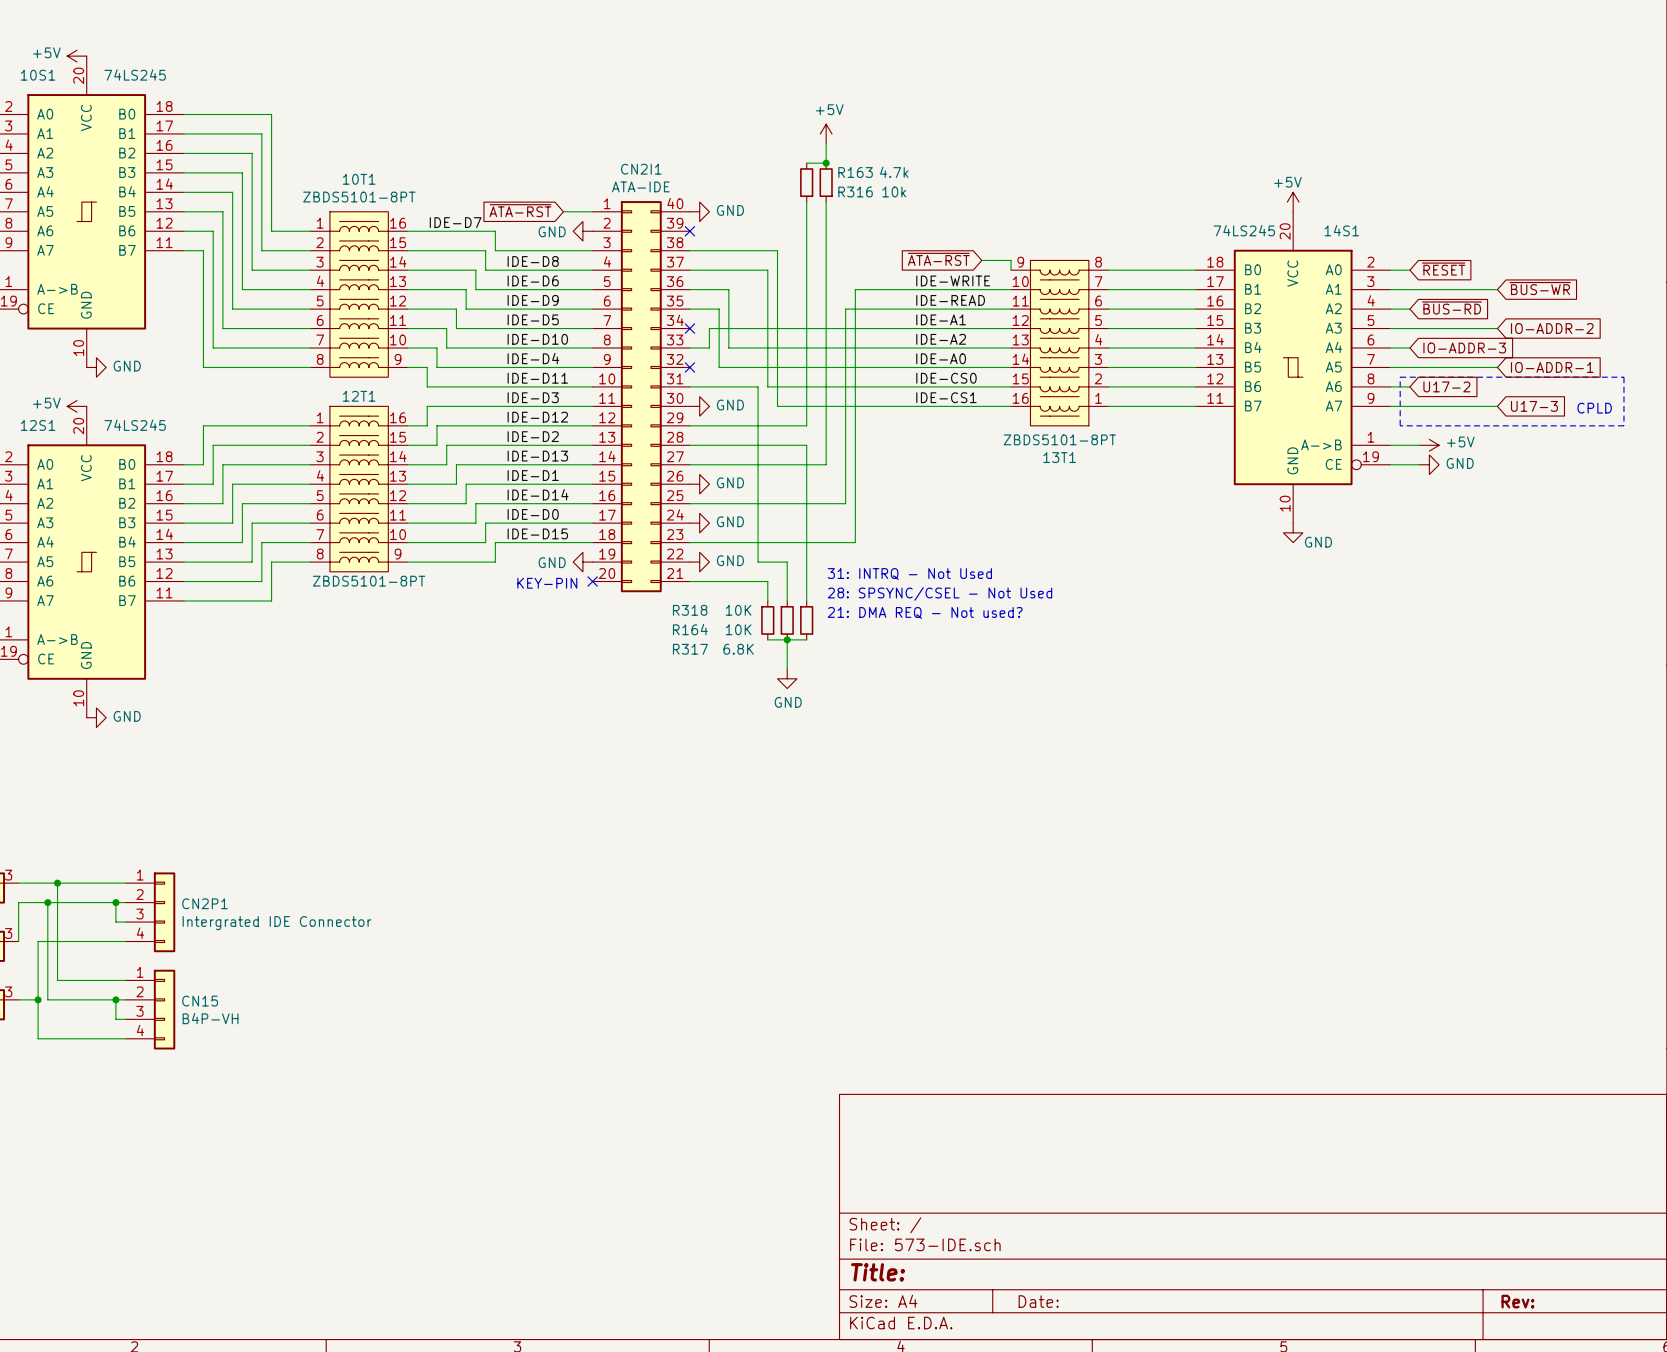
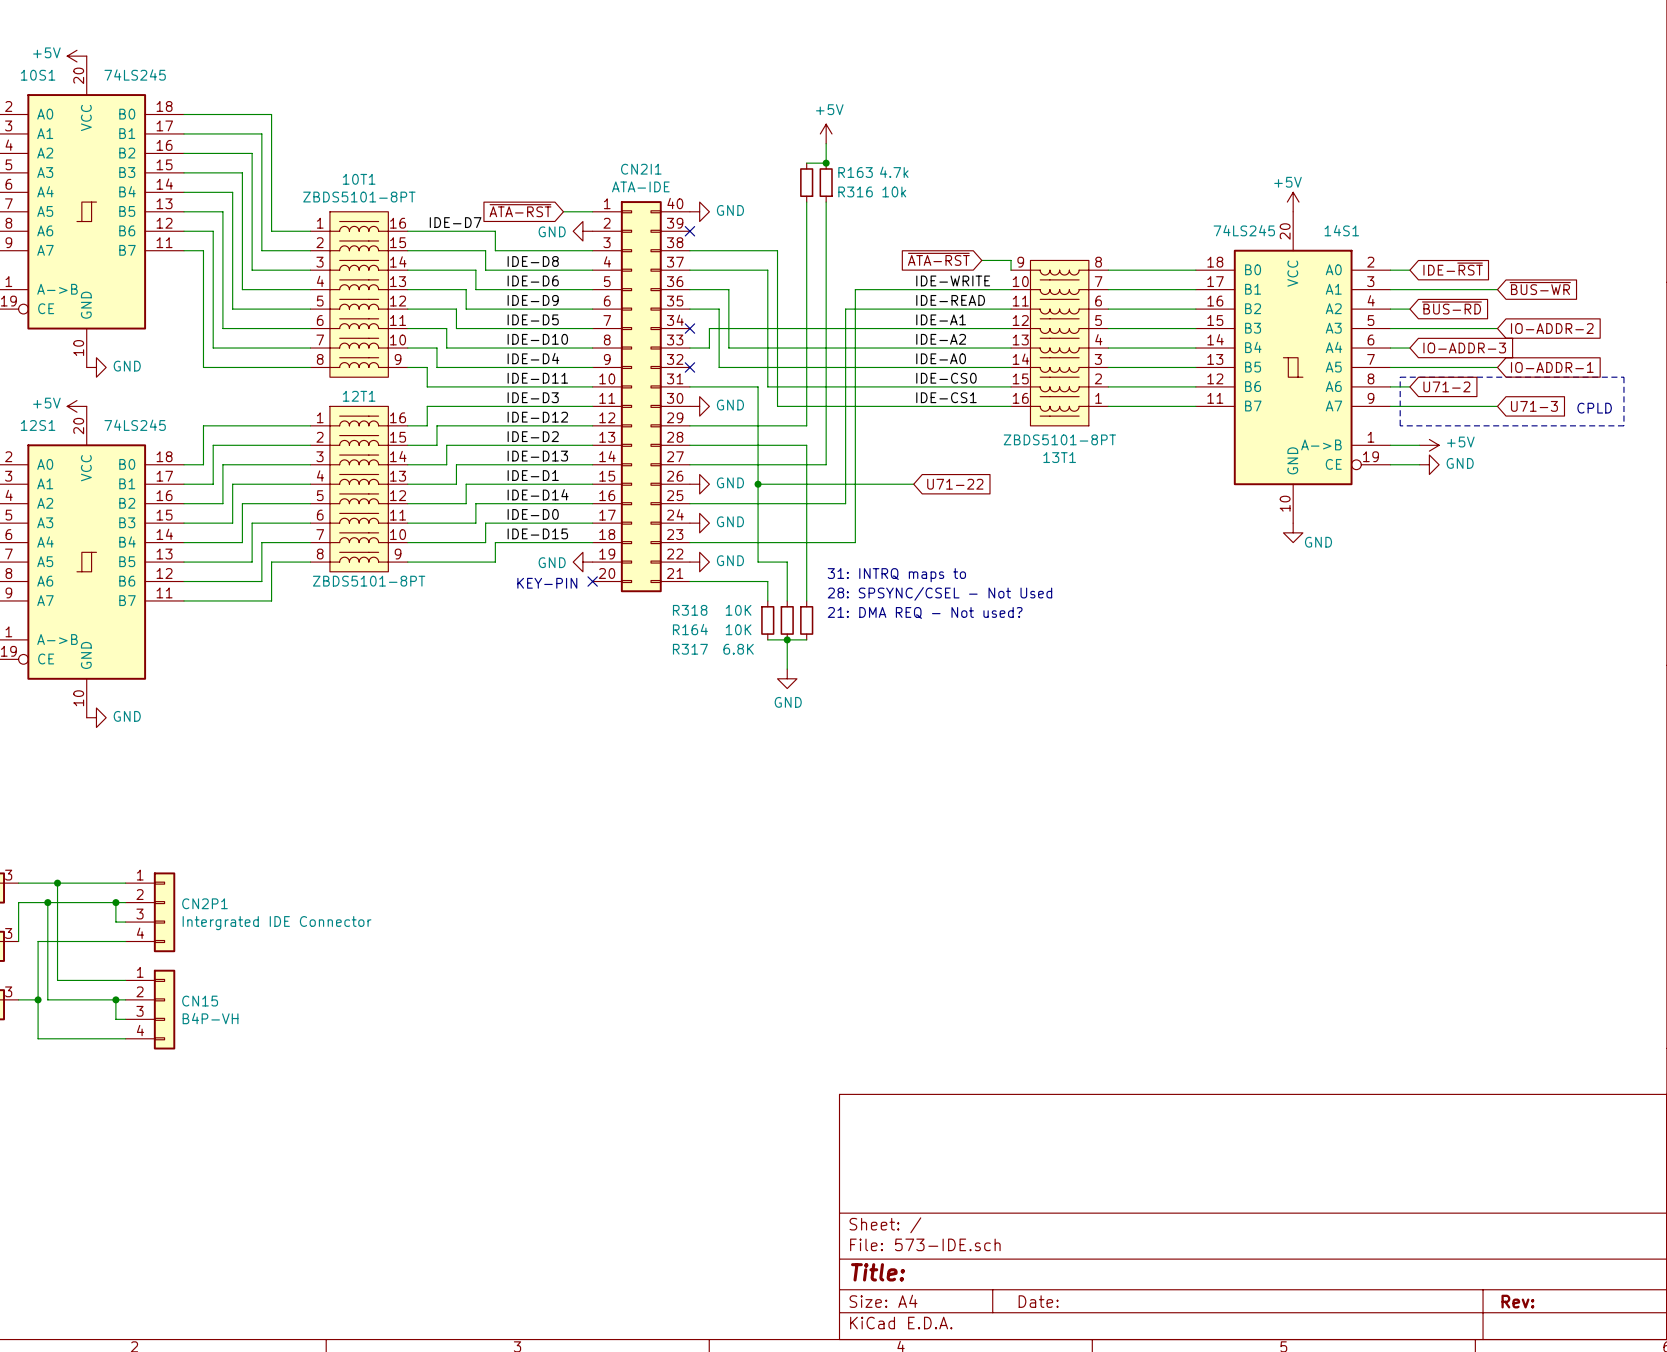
global label: ~{RESET} (1443, 269) -> IDE-~{RST} (1453, 269)
global label: U17-2 (1446, 386) -> U71-2 (1446, 386)
global label: U17-3 (1534, 406) -> U71-3 (1534, 406)
wire: none -> (758, 484) (913, 484)
junction: none -> (758, 484)
global label: none -> U71-22 (955, 484)
text: 31: INTRQ - Not Used (909, 574) -> 31: INTRQ maps to (896, 575)

